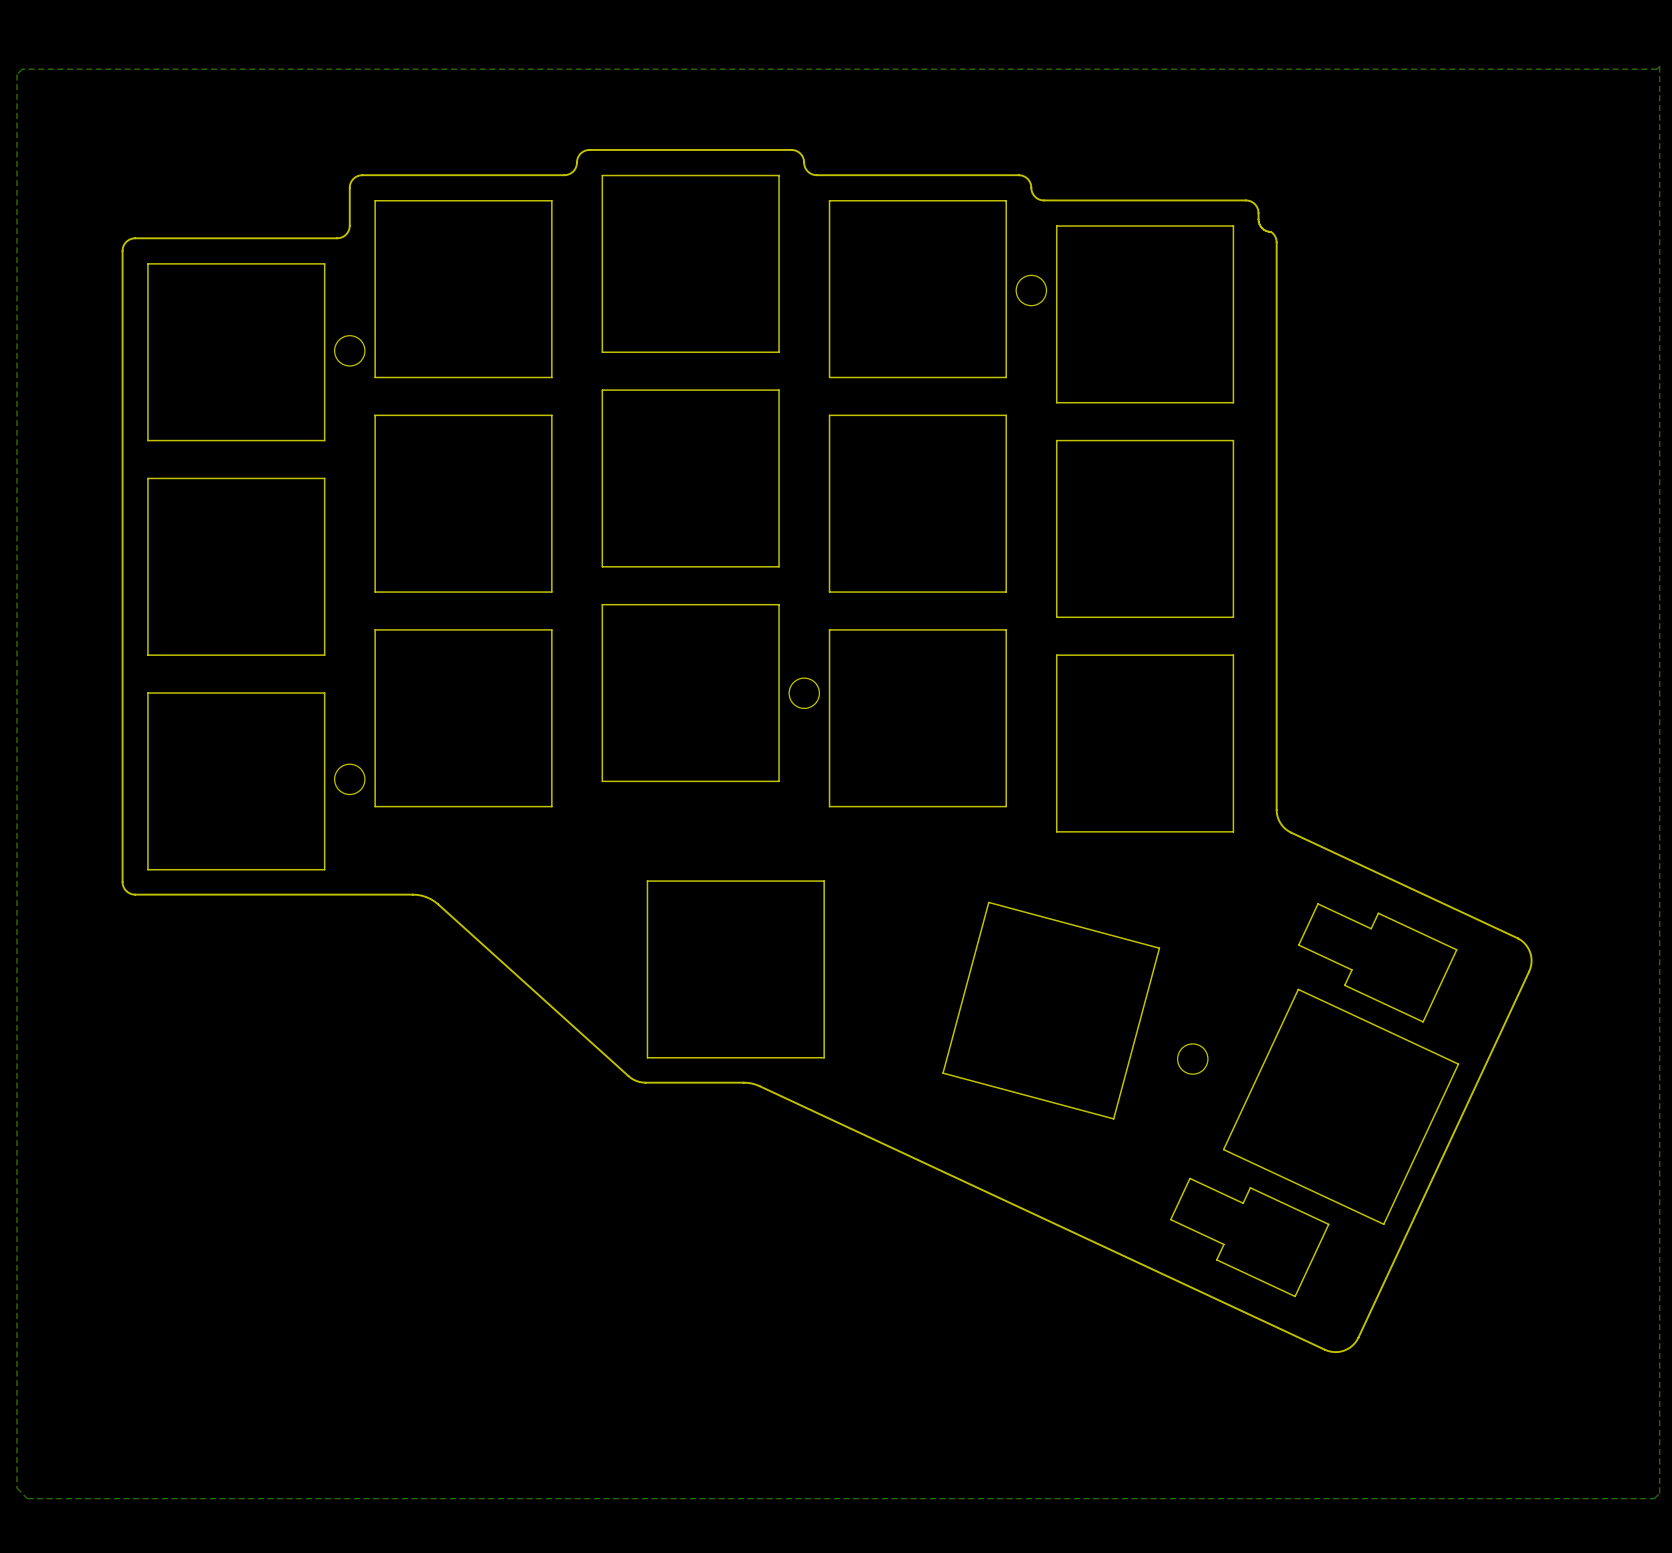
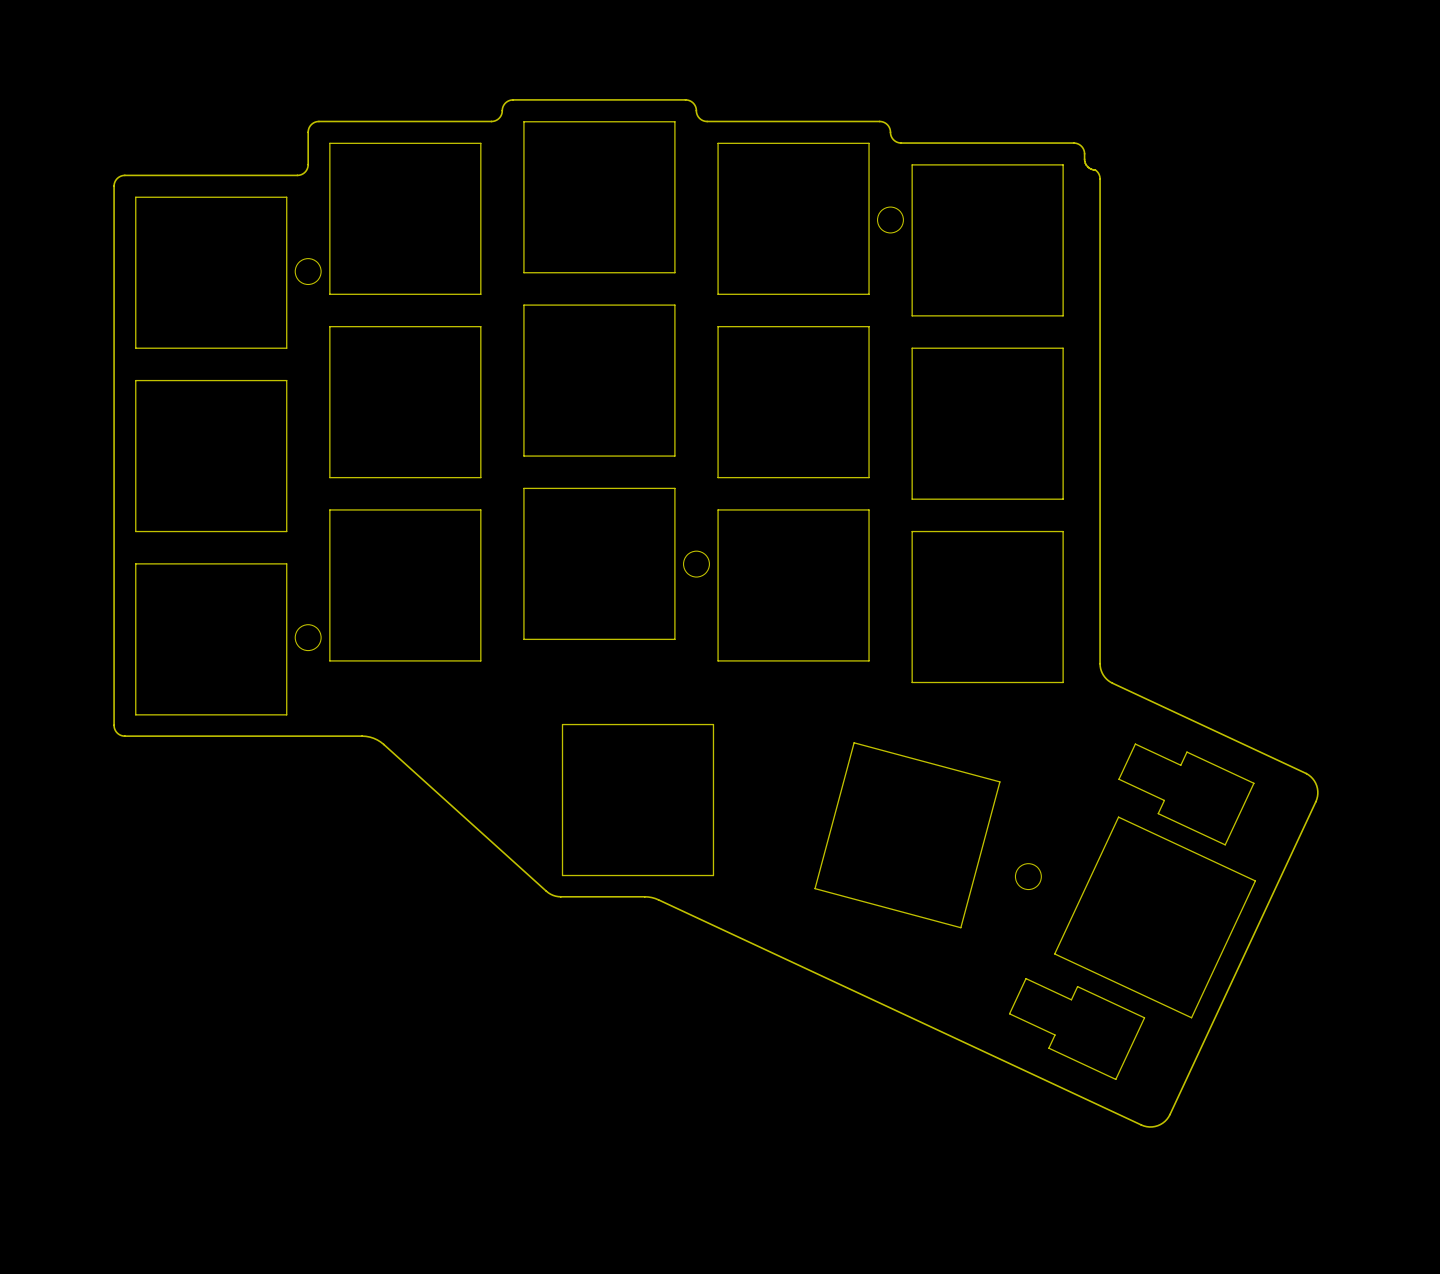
bottom zone outline: (1659, 66) (1659, 1493) (1654, 1498) (27, 1498) (16, 1488) (16, 74) (22, 69) (1657, 69) (1659, 66) -> none

